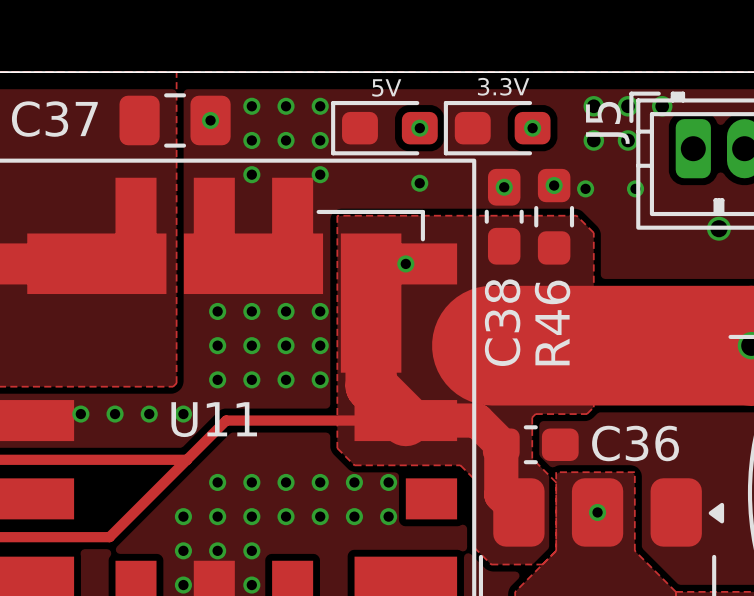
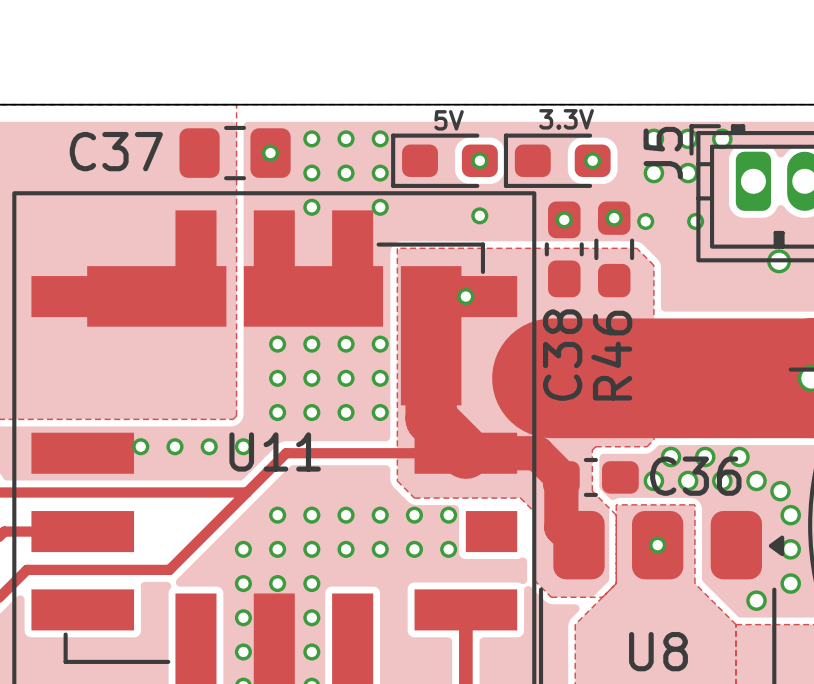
via: none -> (671, 457)
via: none -> (705, 457)
via: none -> (739, 457)
via: none -> (653, 480)
via: none -> (688, 480)
via: none -> (722, 480)
via: none -> (756, 480)
via: none -> (780, 491)
via: none -> (790, 515)
via: none -> (790, 549)
via: none -> (790, 583)
via: none -> (756, 600)

